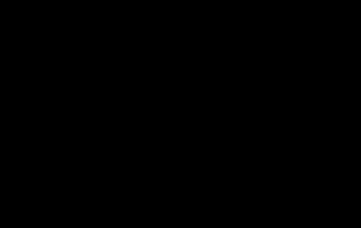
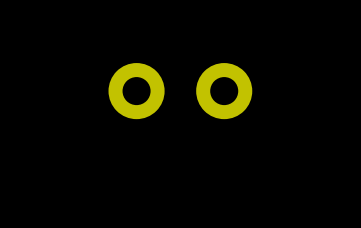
part: none -> (180, 91)

